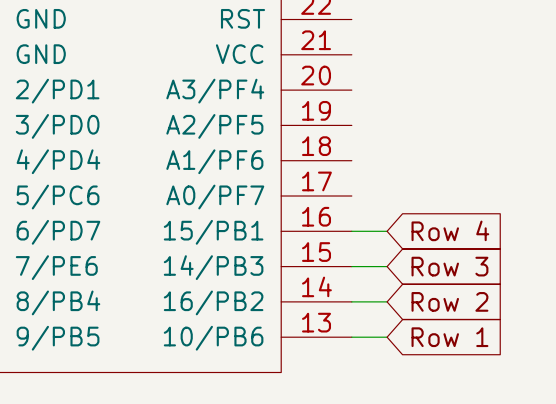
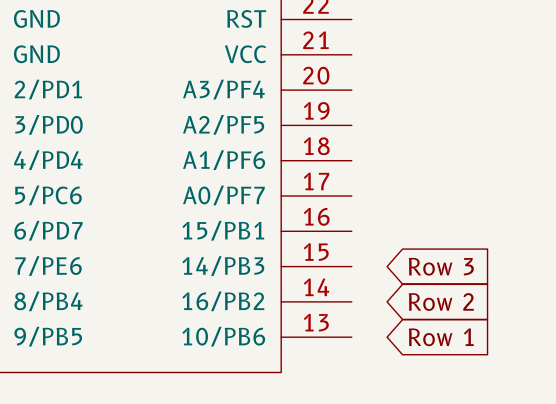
global label: Row 4 (450, 230) -> none
wire: (351, 231) (387, 231) -> none
wire: (351, 266) (387, 266) -> none
wire: (351, 301) (387, 301) -> none
wire: (351, 337) (387, 337) -> none

